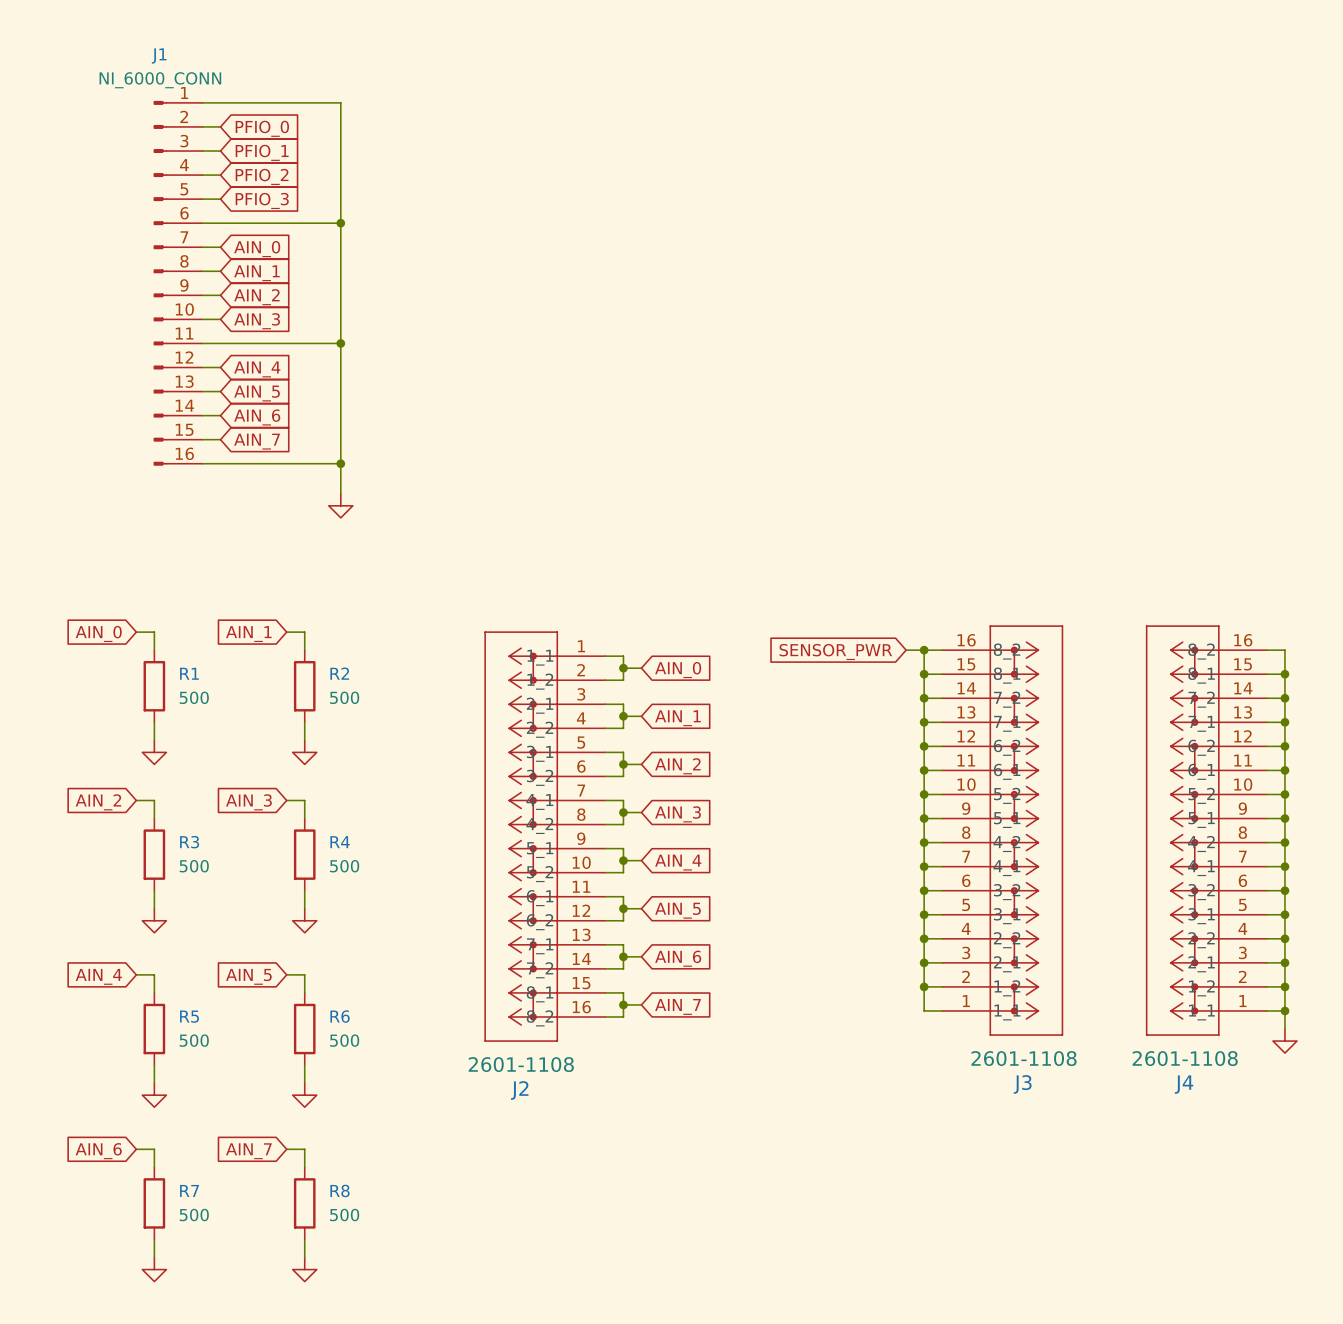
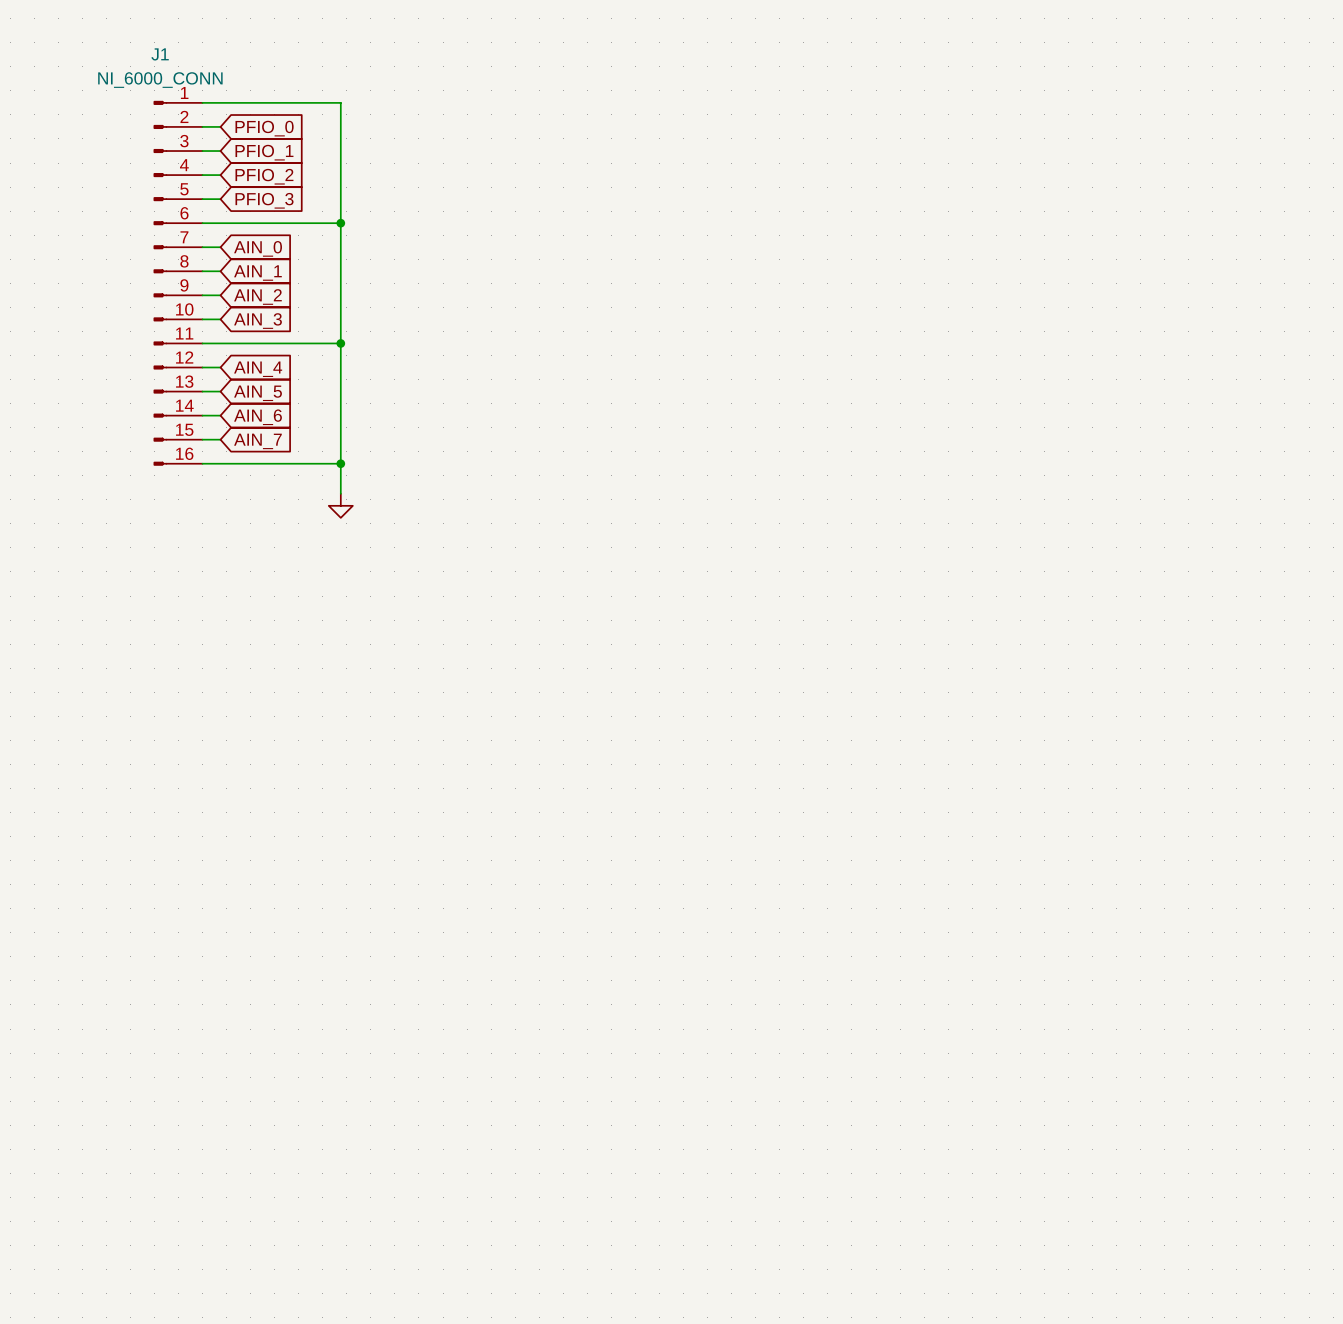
wire: (136, 632) (154, 632) (154, 650) -> none
wire: (286, 632) (304, 632) (304, 650) -> none
global label: AIN_0 (98, 633) -> none
global label: AIN_1 (248, 634) -> none
wire: (906, 650) (942, 650) -> none
wire: (924, 650) (924, 1010) (942, 1010) -> none
junction: (924, 650) -> none
wire: (1266, 650) (1284, 650) (1284, 1029) -> none
global label: SENSOR_PWR (835, 651) -> none
wire: (605, 656) (623, 656) (623, 680) (605, 680) -> none
wire: (623, 668) (641, 668) -> none
junction: (623, 668) -> none
global label: AIN_0 (678, 670) -> none
wire: (924, 674) (942, 674) -> none
junction: (924, 674) -> none
wire: (1266, 674) (1284, 674) -> none
junction: (1284, 674) -> none
R1: 500 (154, 686) -> none
R2: 500 (304, 686) -> none
wire: (924, 698) (942, 698) -> none
junction: (924, 698) -> none
wire: (1266, 698) (1284, 698) -> none
junction: (1284, 698) -> none
wire: (605, 704) (623, 704) (623, 728) (605, 728) -> none
wire: (623, 716) (641, 716) -> none
junction: (623, 716) -> none
global label: AIN_1 (677, 718) -> none
wire: (154, 722) (154, 740) -> none
wire: (304, 722) (304, 740) -> none
wire: (924, 722) (942, 722) -> none
junction: (924, 722) -> none
wire: (1266, 722) (1284, 722) -> none
junction: (1284, 722) -> none
wire: (924, 746) (942, 746) -> none
junction: (924, 746) -> none
wire: (1266, 746) (1284, 746) -> none
junction: (1284, 746) -> none
power symbol: (154, 752) -> none
power symbol: (304, 752) -> none
wire: (605, 752) (623, 752) (623, 776) (605, 776) -> none
wire: (623, 764) (641, 764) -> none
junction: (623, 764) -> none
global label: AIN_2 (677, 766) -> none
wire: (924, 770) (942, 770) -> none
junction: (924, 770) -> none
wire: (1266, 770) (1284, 770) -> none
junction: (1284, 770) -> none
wire: (924, 794) (942, 794) -> none
junction: (924, 794) -> none
wire: (1266, 794) (1284, 794) -> none
junction: (1284, 794) -> none
wire: (136, 800) (154, 800) (154, 818) -> none
wire: (286, 800) (304, 800) (304, 818) -> none
wire: (605, 800) (623, 800) (623, 824) (605, 824) -> none
global label: AIN_2 (98, 802) -> none
global label: AIN_3 (248, 802) -> none
wire: (623, 812) (641, 812) -> none
junction: (623, 812) -> none
global label: AIN_3 (678, 814) -> none
wire: (924, 818) (942, 818) -> none
junction: (924, 818) -> none
wire: (1266, 818) (1284, 818) -> none
junction: (1284, 818) -> none
J3: 2601-1108 (1002, 830) -> none
J4: 2601-1108 (1206, 830) -> none
J2: 2601-1108 (544, 836) -> none
wire: (924, 842) (942, 842) -> none
junction: (924, 842) -> none
wire: (1266, 842) (1284, 842) -> none
junction: (1284, 842) -> none
wire: (605, 848) (623, 848) (623, 872) (605, 872) -> none
R3: 500 (154, 854) -> none
R4: 500 (304, 854) -> none
wire: (623, 860) (641, 860) -> none
junction: (623, 860) -> none
global label: AIN_4 (678, 862) -> none
wire: (924, 866) (942, 866) -> none
junction: (924, 866) -> none
wire: (1266, 866) (1284, 866) -> none
junction: (1284, 866) -> none
wire: (154, 890) (154, 908) -> none
wire: (304, 890) (304, 908) -> none
wire: (924, 890) (942, 890) -> none
junction: (924, 890) -> none
wire: (1266, 890) (1284, 890) -> none
junction: (1284, 890) -> none
wire: (605, 896) (623, 896) (623, 920) (605, 920) -> none
wire: (623, 908) (641, 908) -> none
junction: (623, 908) -> none
global label: AIN_5 (677, 910) -> none
wire: (924, 914) (942, 914) -> none
junction: (924, 914) -> none
wire: (1266, 914) (1284, 914) -> none
junction: (1284, 914) -> none
power symbol: (154, 920) -> none
power symbol: (304, 920) -> none
wire: (924, 938) (942, 938) -> none
junction: (924, 938) -> none
wire: (1266, 938) (1284, 938) -> none
junction: (1284, 938) -> none
wire: (605, 944) (623, 944) (623, 968) (605, 968) -> none
wire: (623, 956) (641, 956) -> none
junction: (623, 956) -> none
global label: AIN_6 (678, 958) -> none
wire: (924, 962) (942, 962) -> none
junction: (924, 962) -> none
wire: (1266, 962) (1284, 962) -> none
junction: (1284, 962) -> none
wire: (136, 974) (154, 974) (154, 992) -> none
wire: (286, 974) (304, 974) (304, 992) -> none
global label: AIN_4 (98, 976) -> none
global label: AIN_5 (248, 976) -> none
wire: (924, 986) (942, 986) -> none
junction: (924, 986) -> none
wire: (1266, 986) (1284, 986) -> none
junction: (1284, 986) -> none
wire: (605, 992) (623, 992) (623, 1017) (605, 1017) -> none
wire: (623, 1004) (641, 1004) -> none
junction: (623, 1004) -> none
global label: AIN_7 (678, 1006) -> none
wire: (1266, 1010) (1284, 1010) -> none
junction: (1284, 1010) -> none
R5: 500 (154, 1029) -> none
R6: 500 (304, 1029) -> none
power symbol: (1284, 1041) -> none
wire: (154, 1065) (154, 1083) -> none
wire: (304, 1065) (304, 1083) -> none
power symbol: (154, 1095) -> none
power symbol: (304, 1095) -> none
wire: (136, 1149) (154, 1149) (154, 1167) -> none
wire: (286, 1149) (304, 1149) (304, 1167) -> none
global label: AIN_6 (98, 1151) -> none
global label: AIN_7 (248, 1151) -> none
R7: 500 (154, 1203) -> none
R8: 500 (304, 1203) -> none
wire: (154, 1239) (154, 1257) -> none
wire: (304, 1239) (304, 1257) -> none
power symbol: (154, 1269) -> none
power symbol: (304, 1269) -> none

